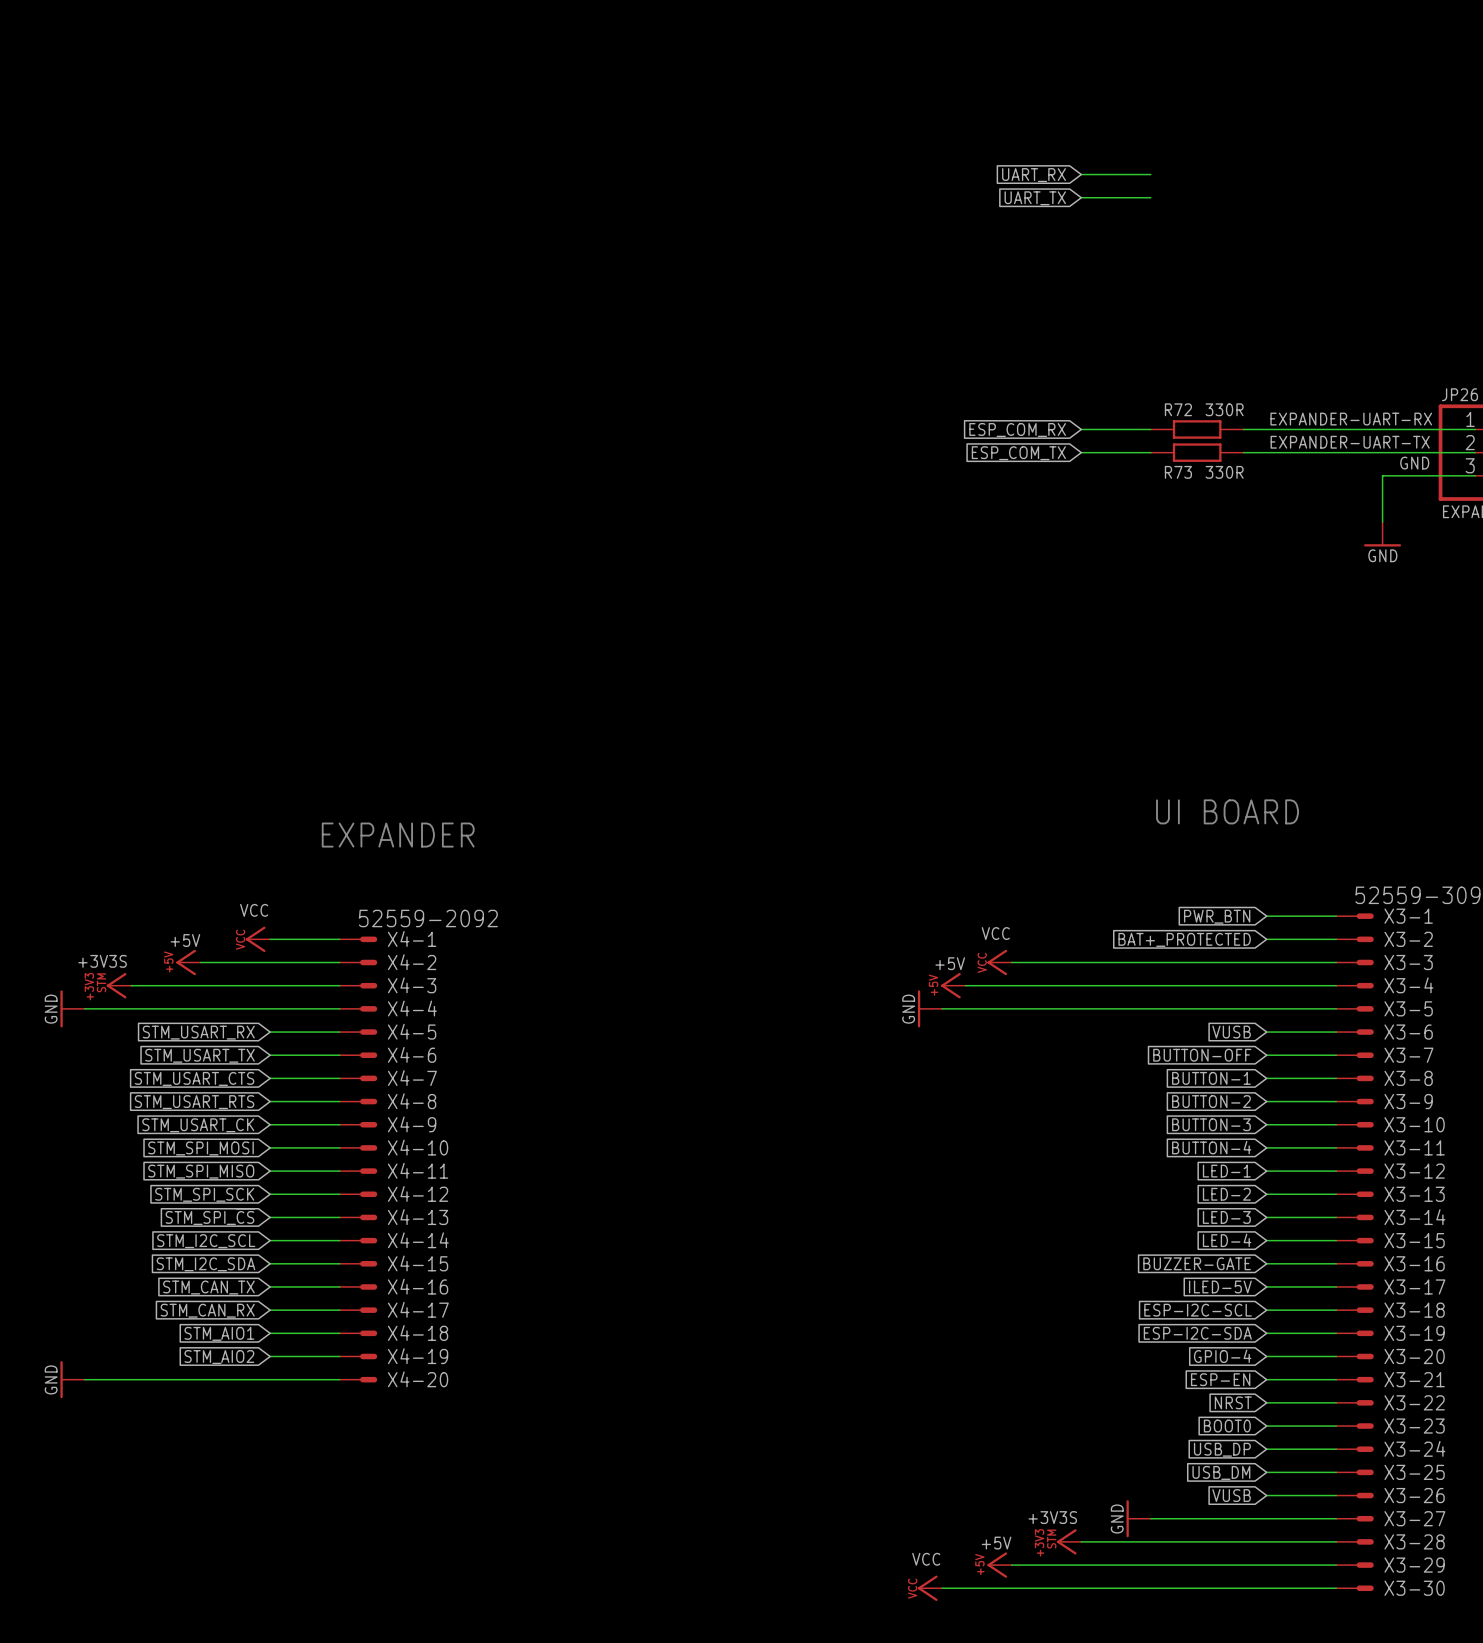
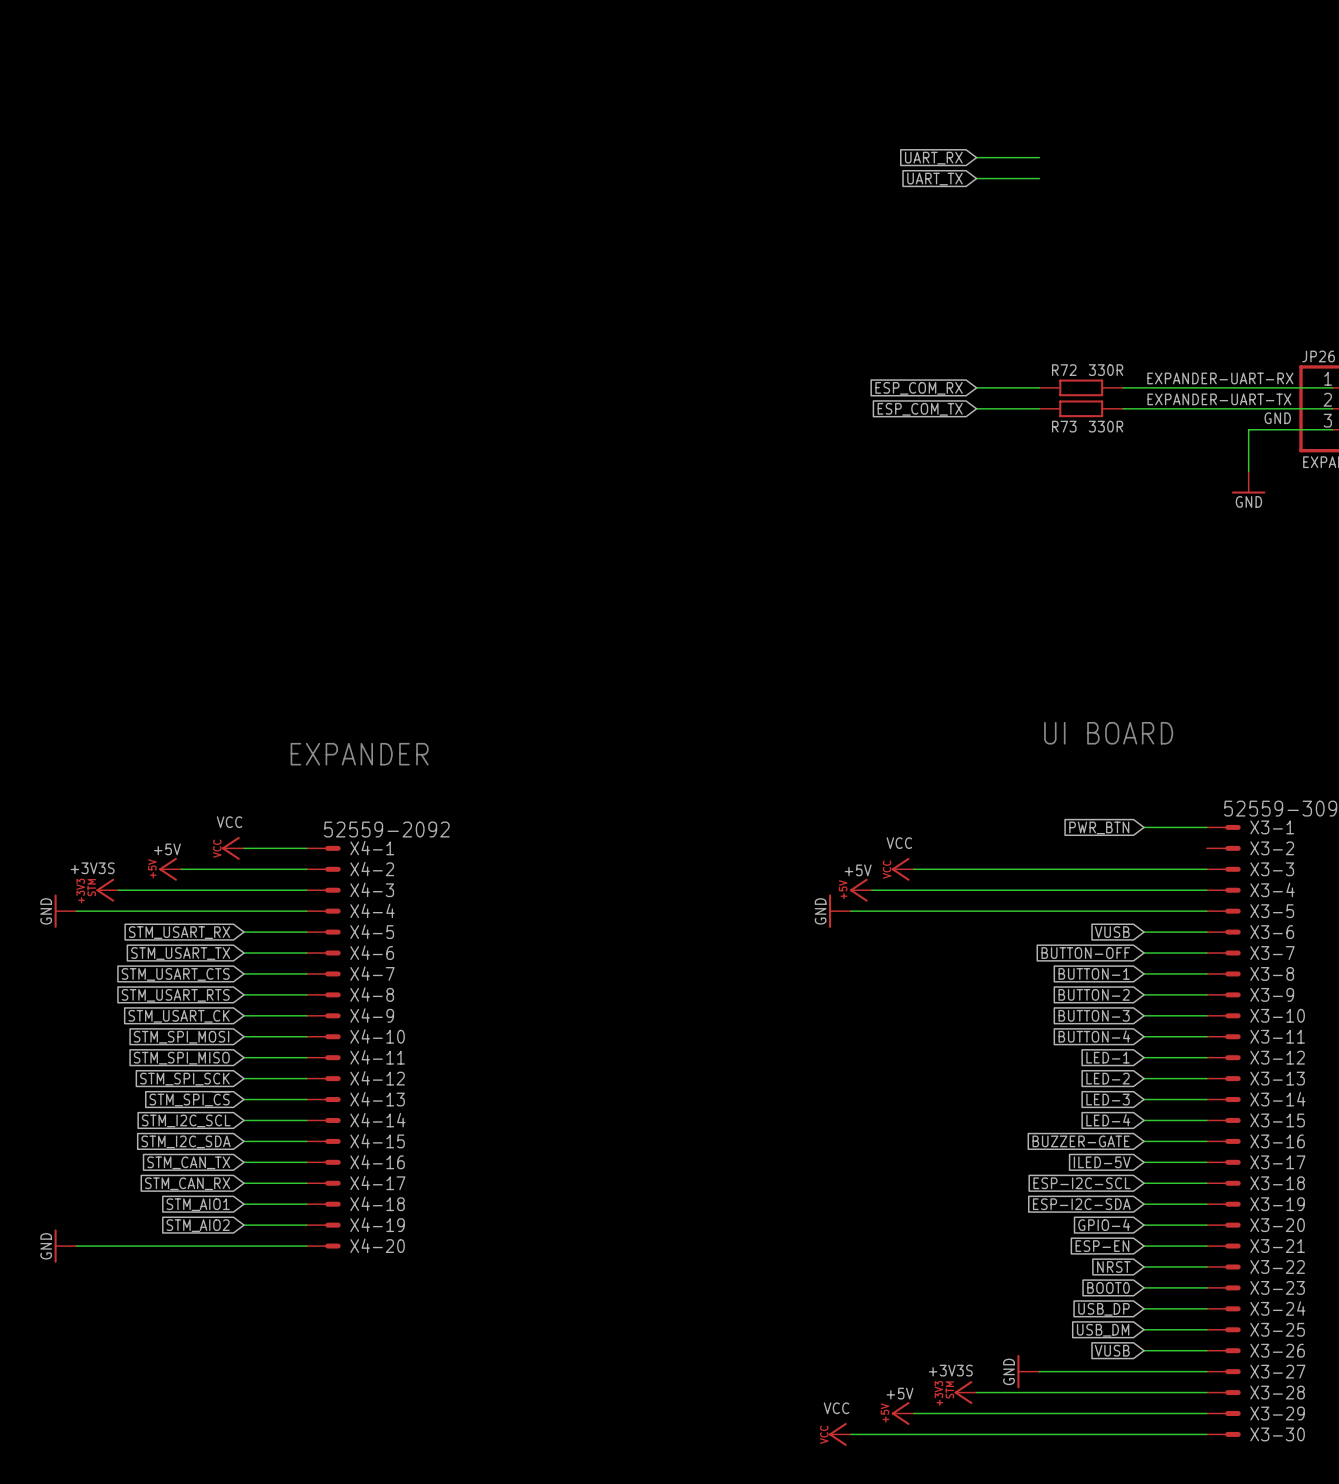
global label: BAT+_PROTECTED (1184, 939) -> none
wire: (1266, 939) (1336, 939) -> none

